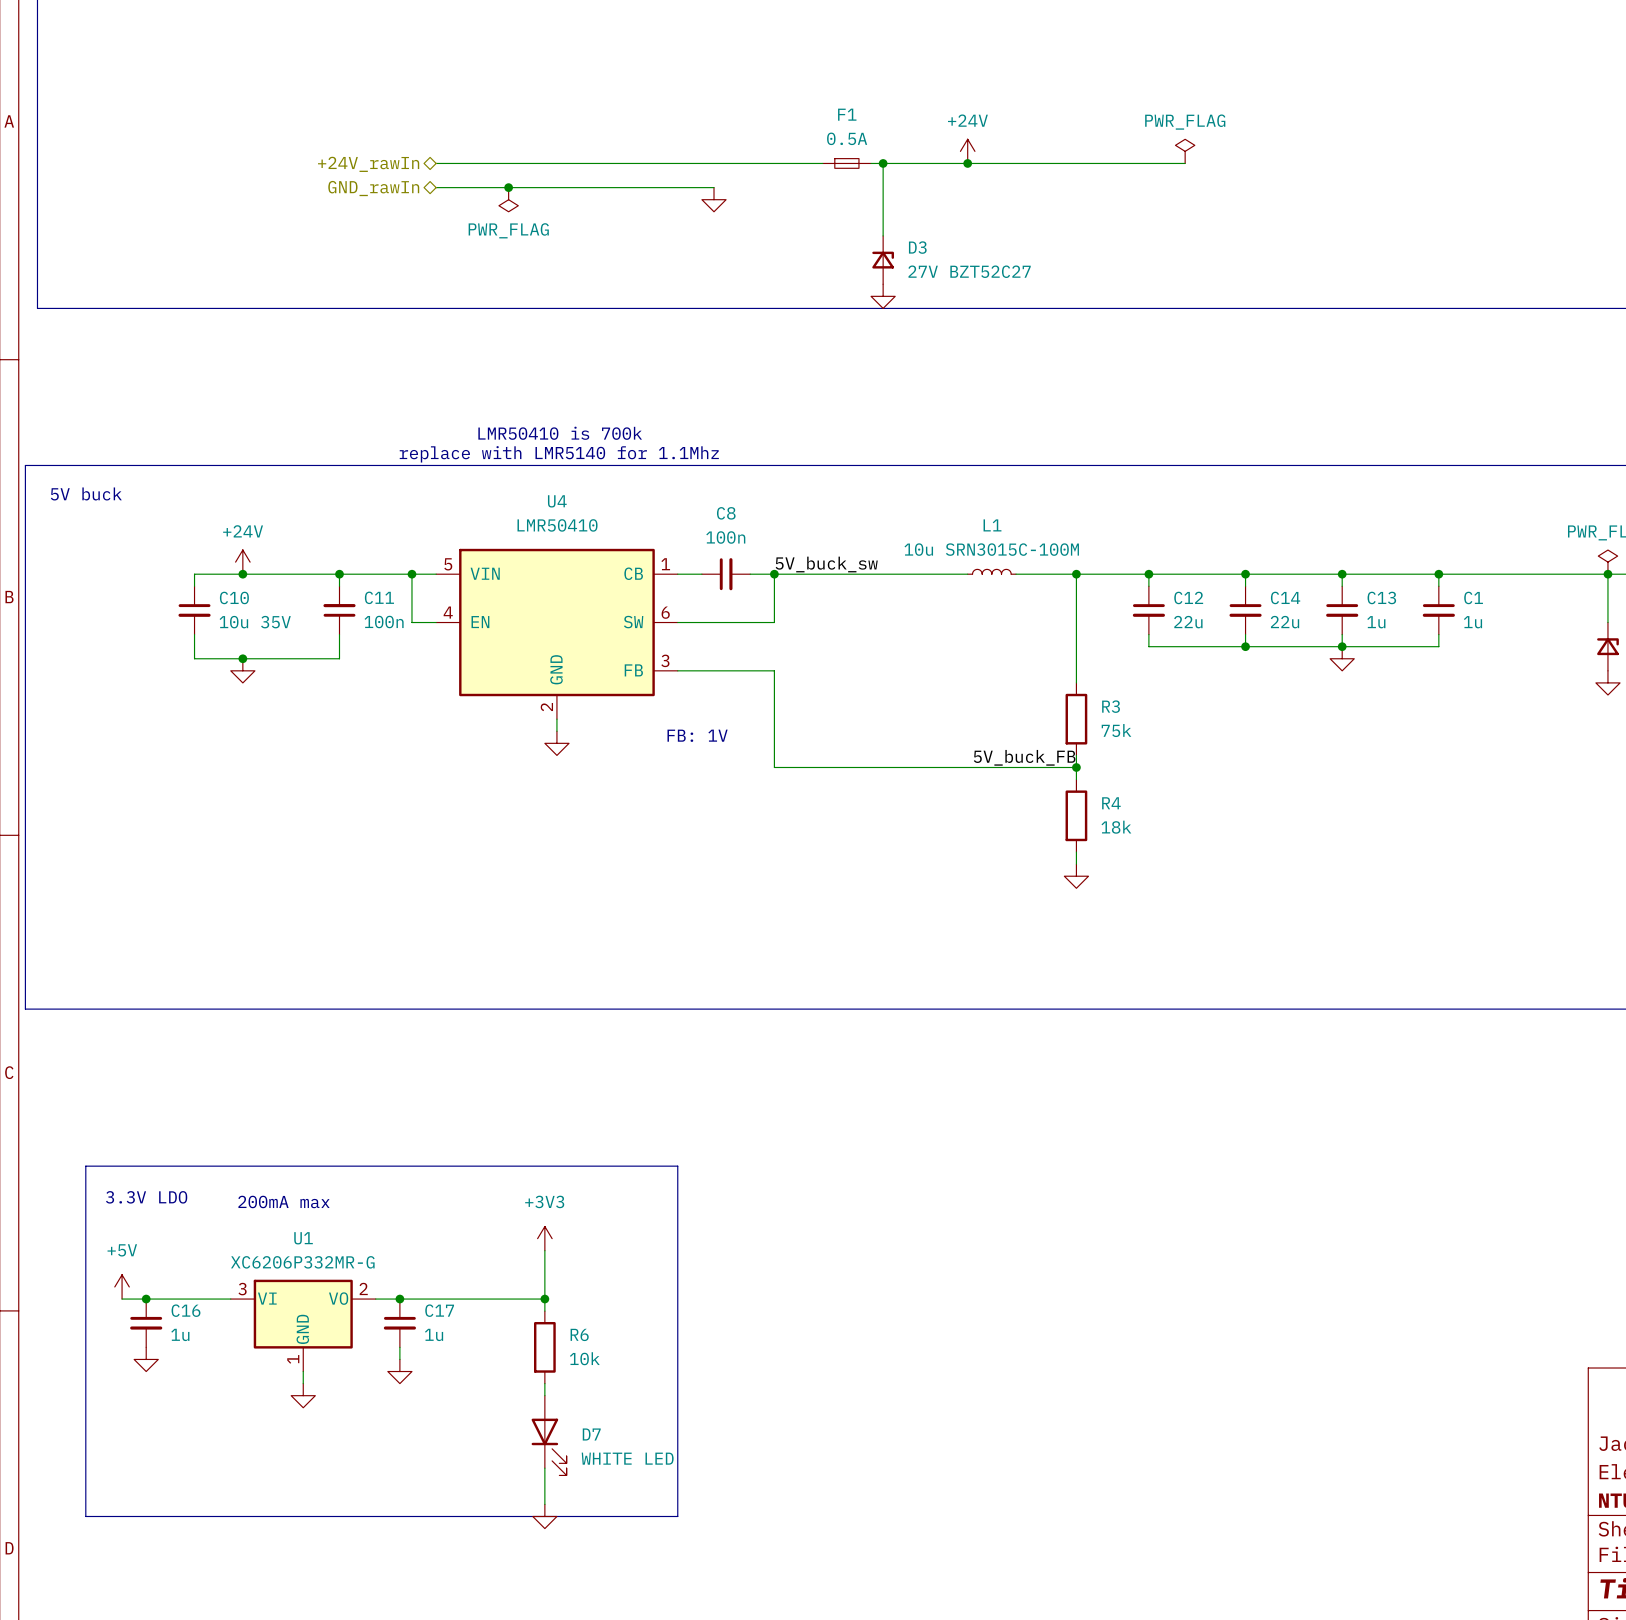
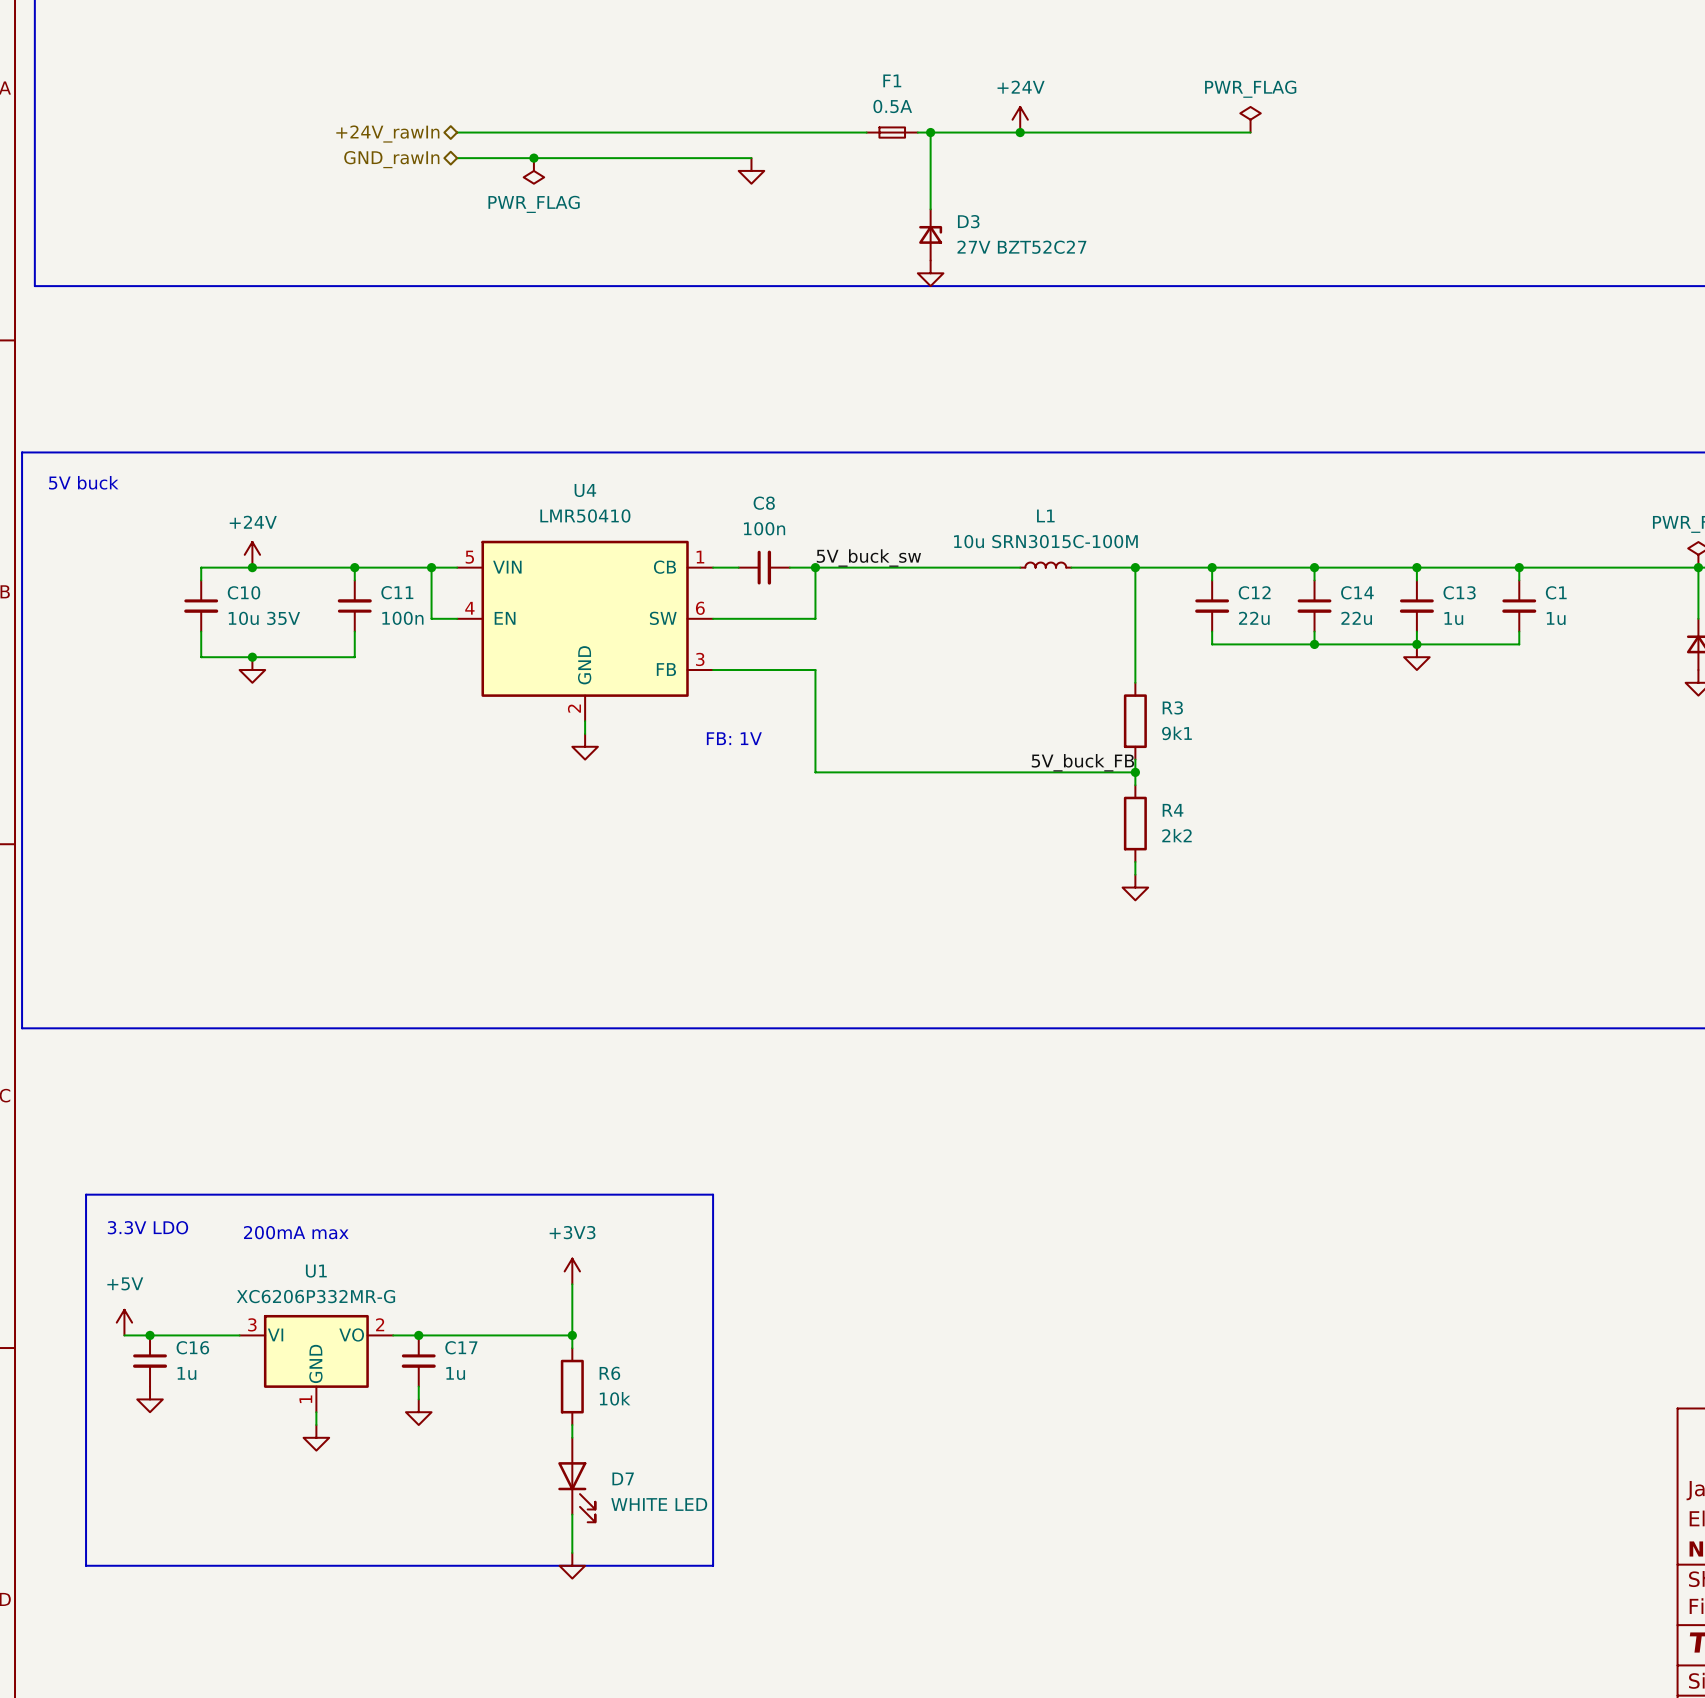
text: LMR50410 is 700k (560, 433) -> none
text: replace with LMR5140 for 1.1Mhz (559, 454) -> none
R3 value: 75k (1116, 730) -> 9k1 (1176, 733)
R4 value: 18k (1116, 827) -> 2k2 (1176, 835)

